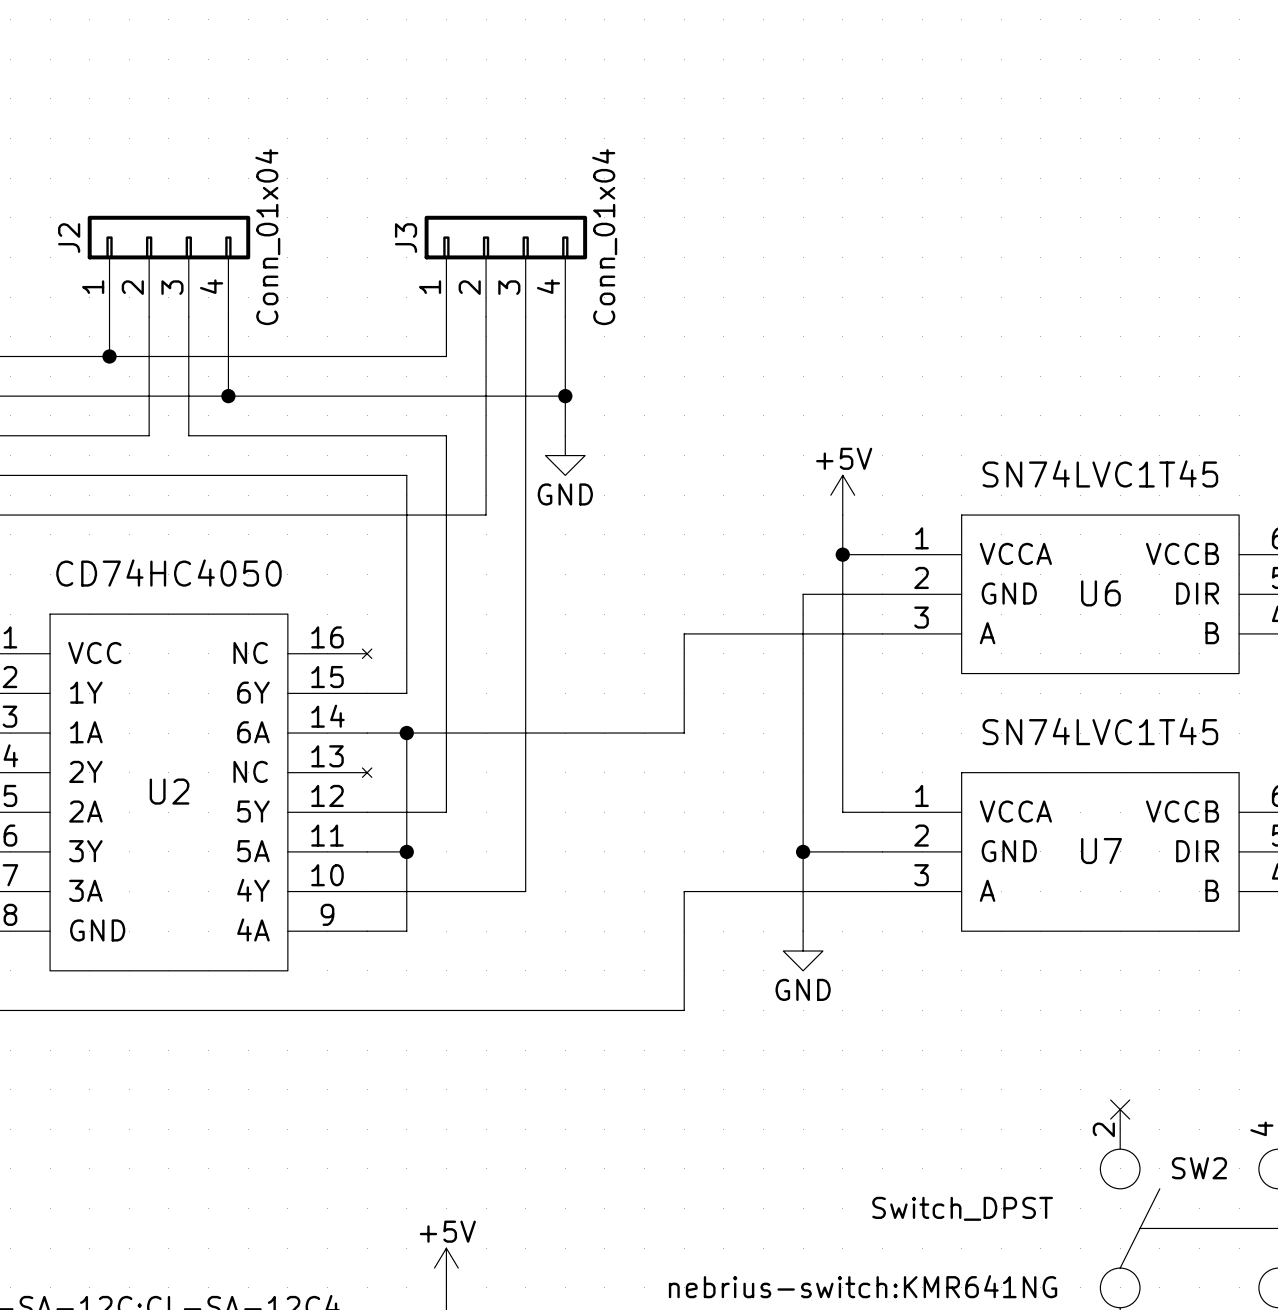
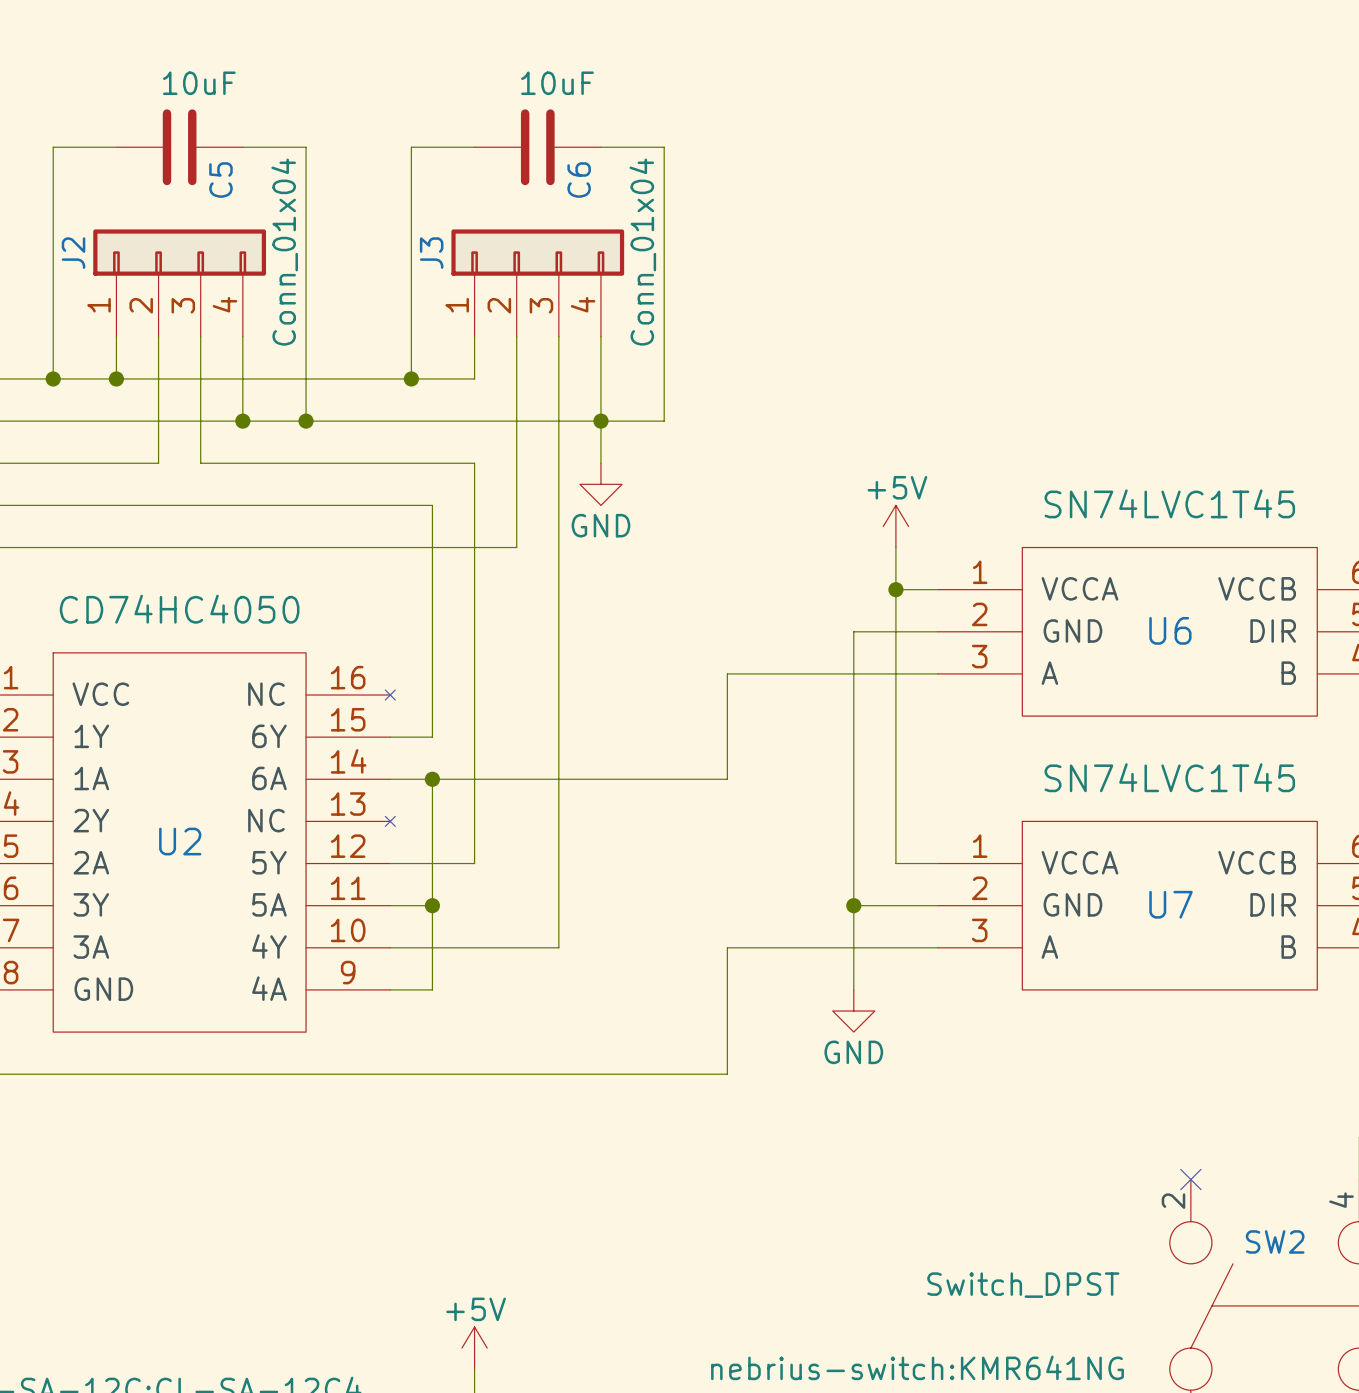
wire: none -> (116, 147) (53, 147) (53, 378)
C5: none -> 10uF (179, 147)
wire: none -> (242, 147) (306, 147) (306, 421)
wire: none -> (474, 147) (411, 147) (411, 378)
C6: none -> 10uF (537, 147)
wire: none -> (600, 147) (664, 147) (664, 421) (600, 421)
junction: none -> (53, 378)
junction: none -> (411, 378)
junction: none -> (306, 421)

